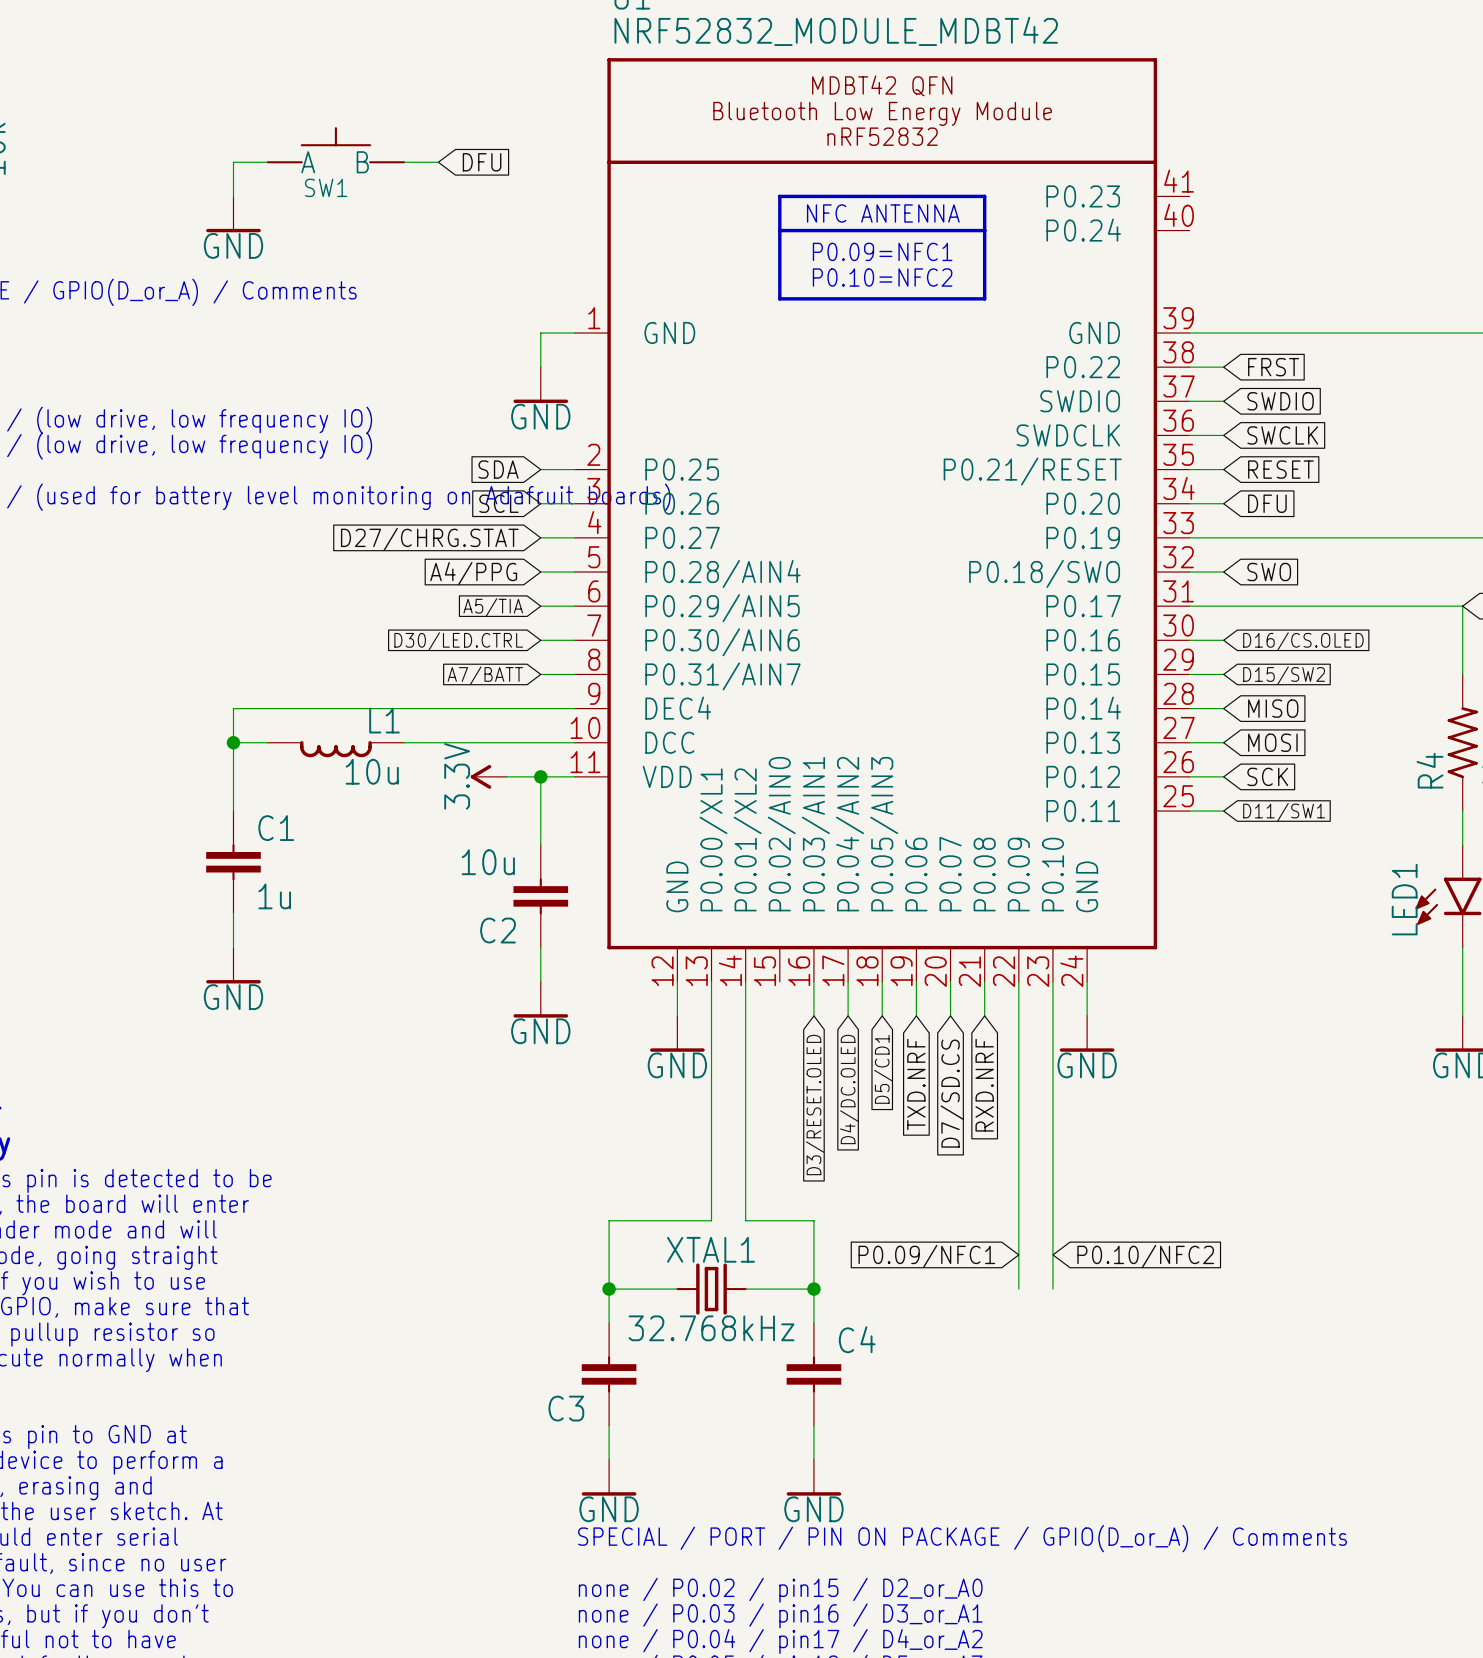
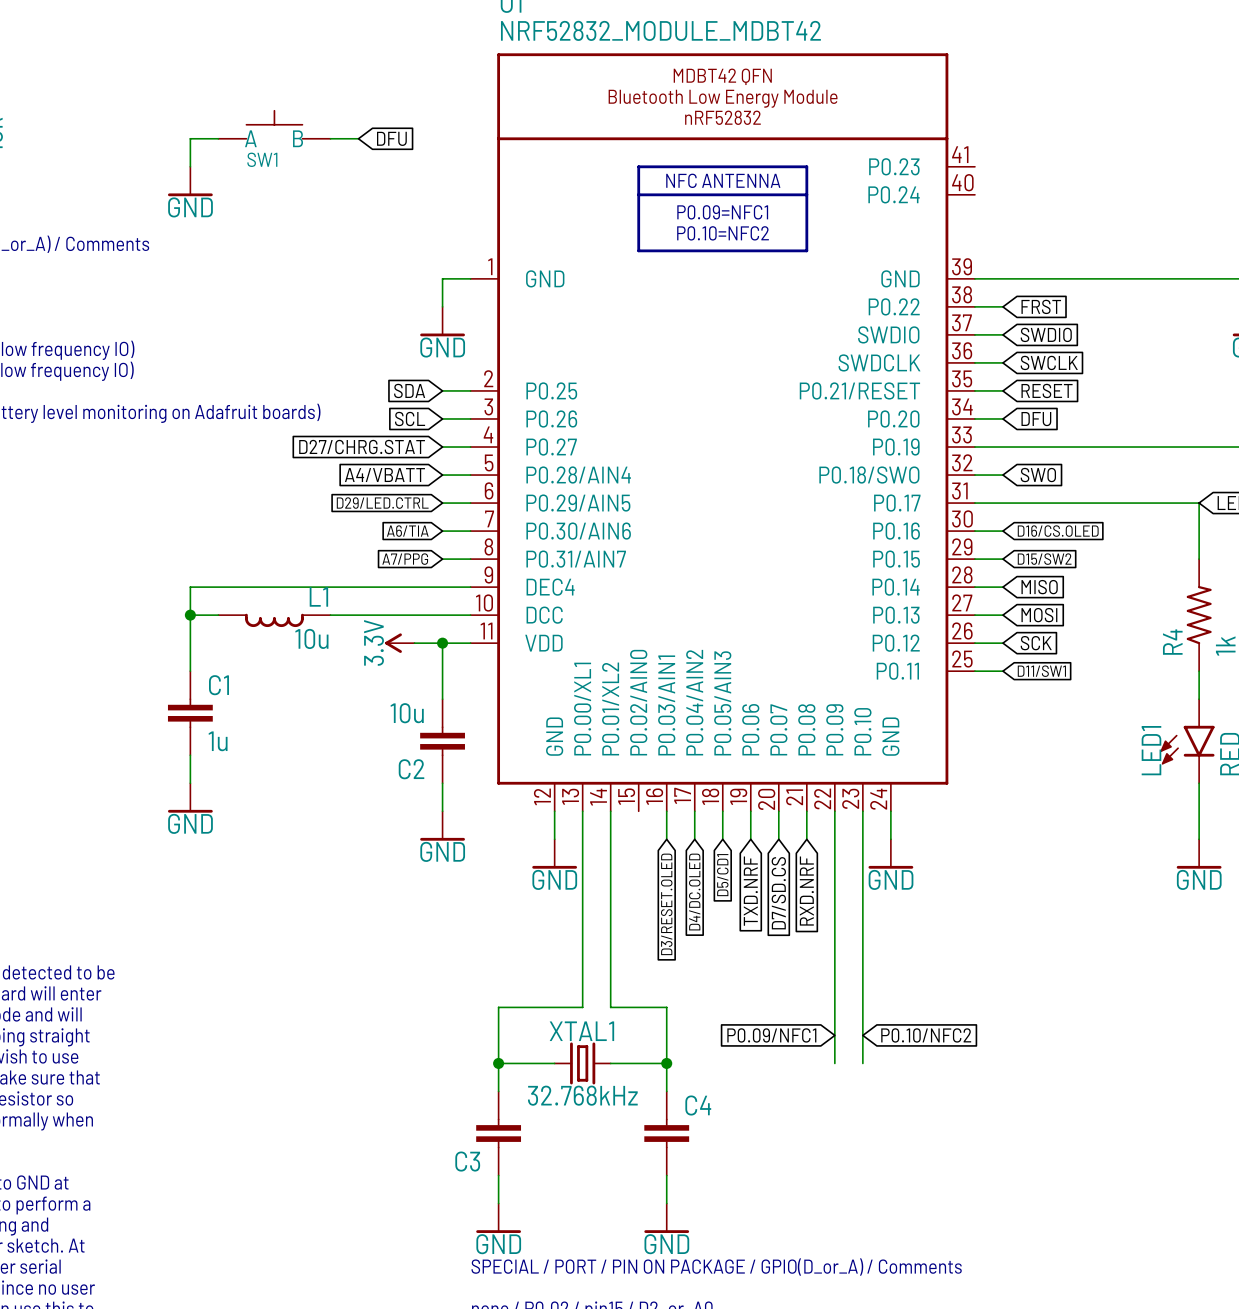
global label: A4/PPG (473, 573) -> A4/VBATT (384, 475)
global label: A5/TIA (493, 607) -> D29/LED.CTRL (382, 503)
global label: D30/LED.CTRL (458, 641) -> A6/TIA (407, 531)
global label: A7/BATT (485, 675) -> A7/PPG (405, 559)

